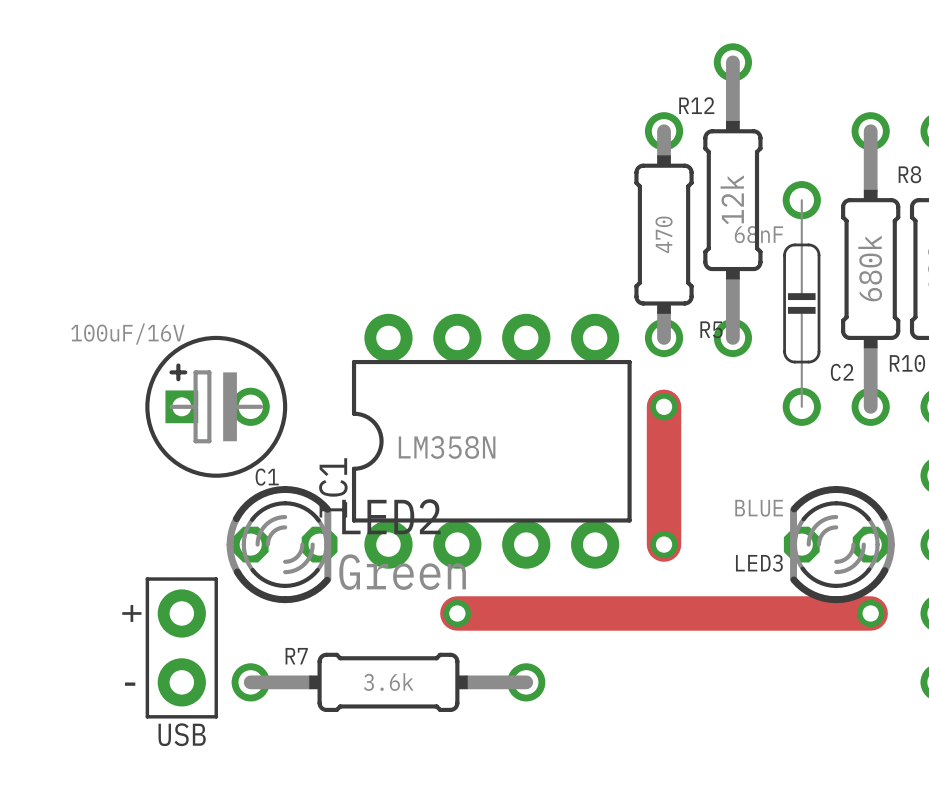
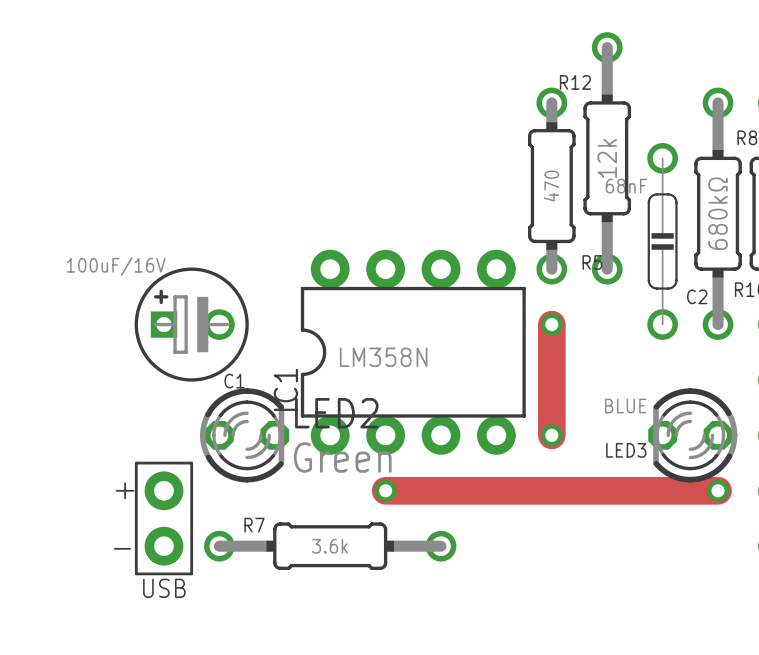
R10 value: 680k (870, 268) -> 680kΩ (718, 213)

